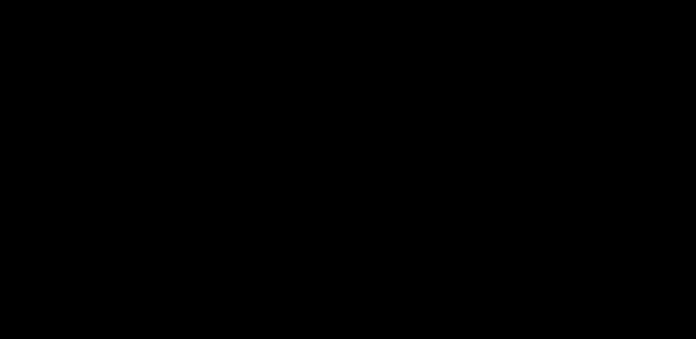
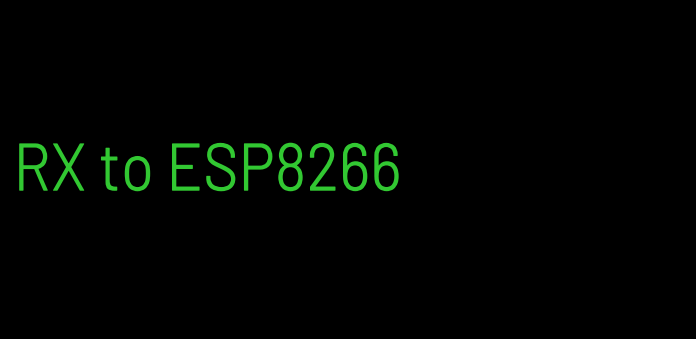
text: none -> RX to ESP8266 (208, 166)

